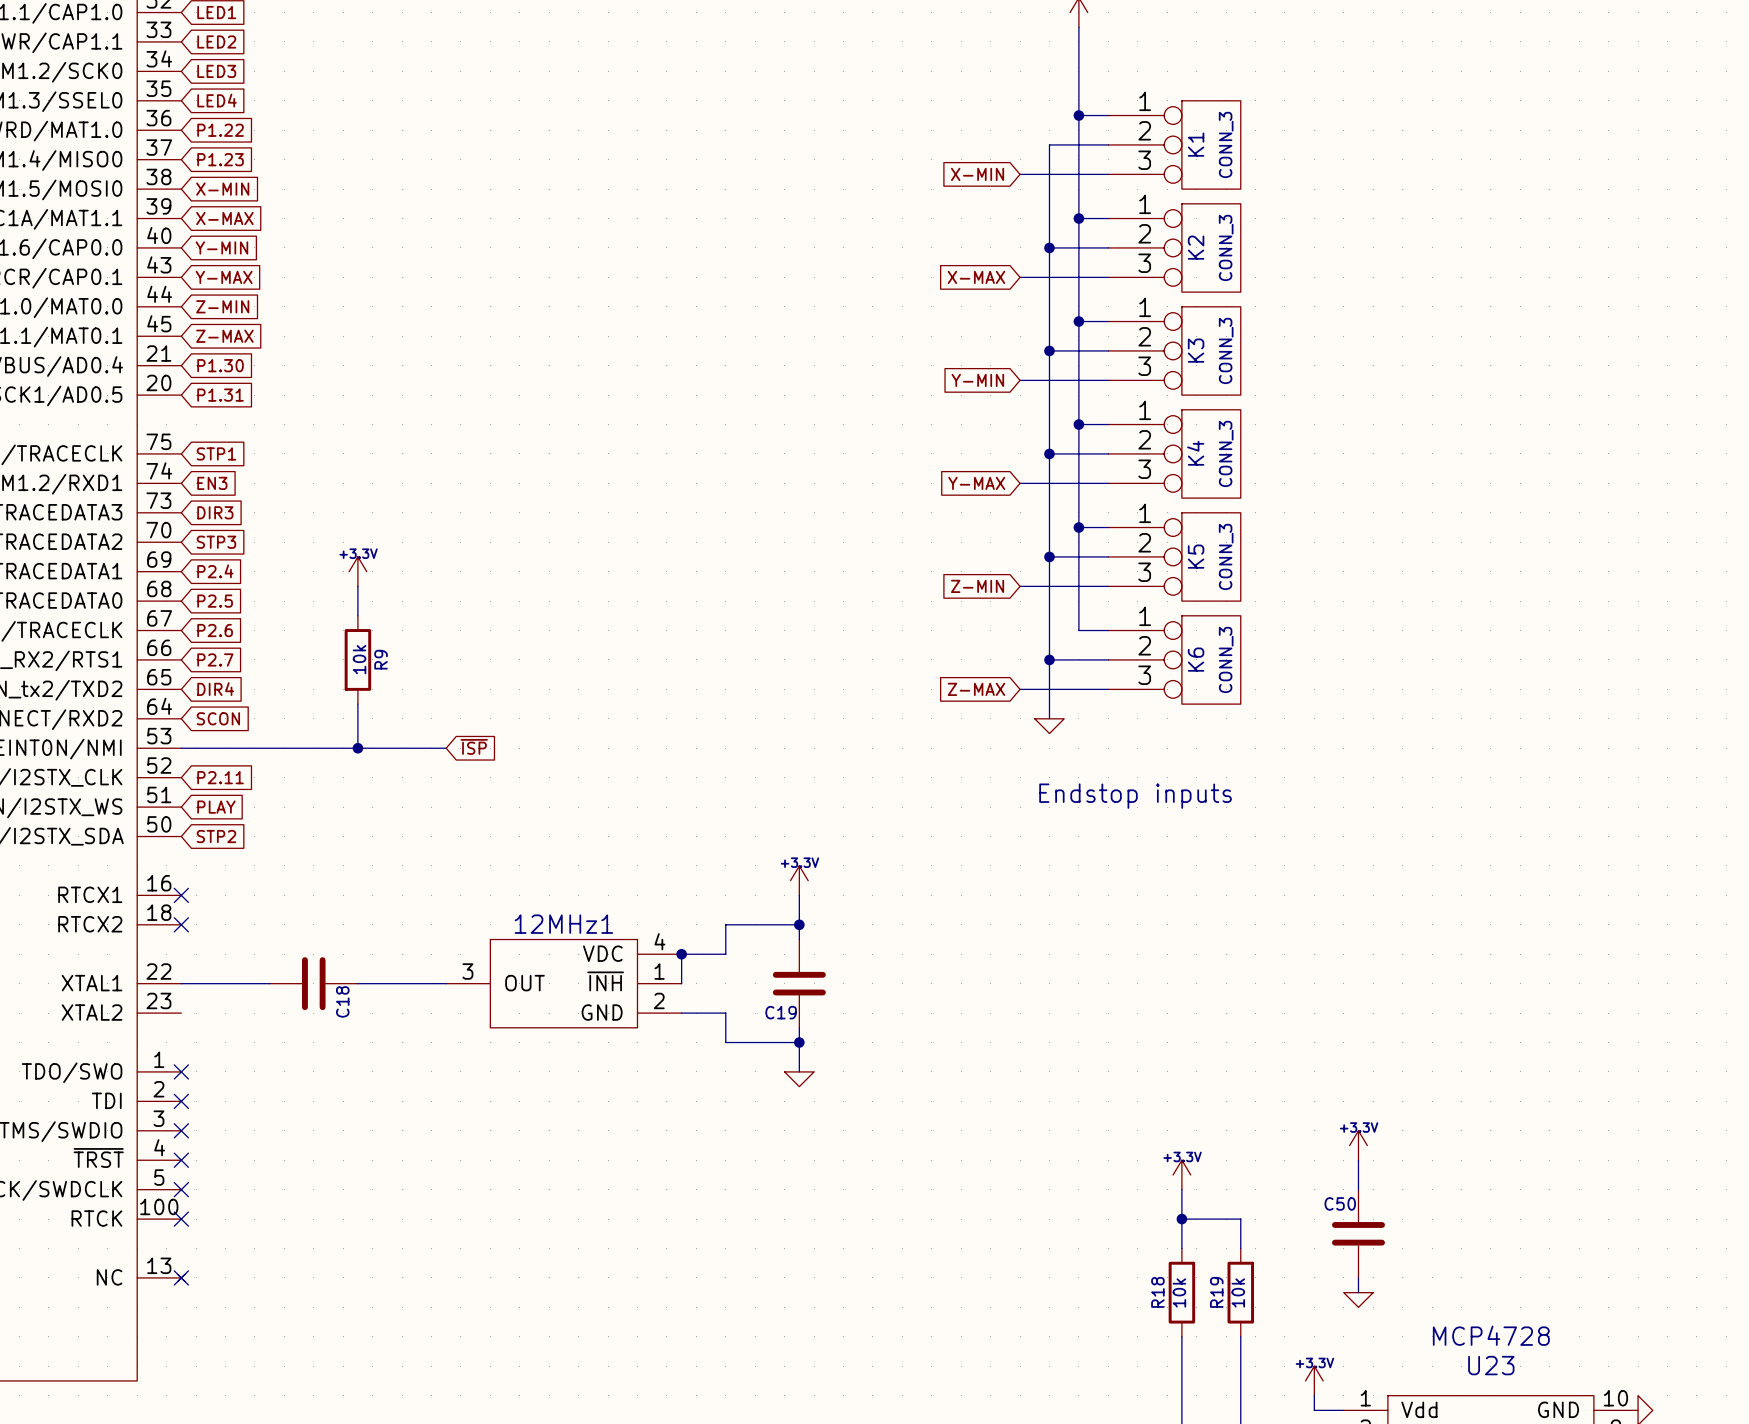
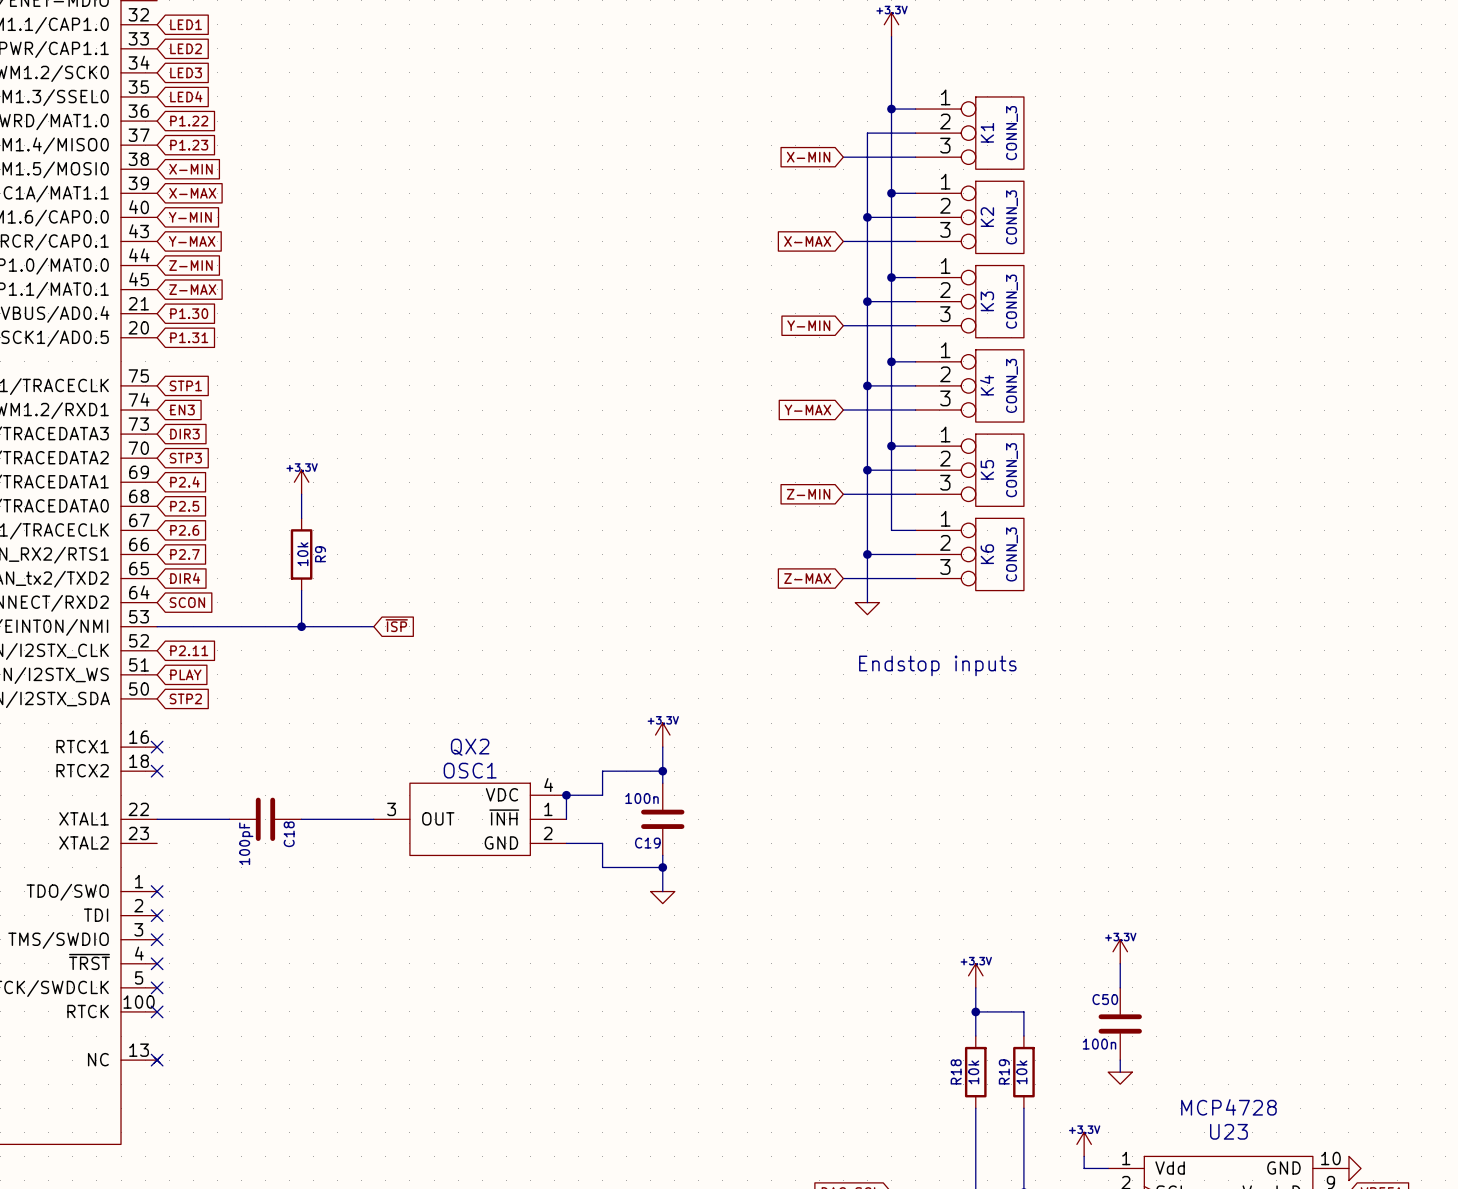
12MHz1 value: none -> QX2 (470, 747)
12MHz1 name: 12MHz1 (563, 924) -> OSC1 (470, 770)
C19 value: none -> 100n (642, 798)
C18 value: none -> 100pF (246, 843)
C50 value: none -> 100n (1099, 1044)

